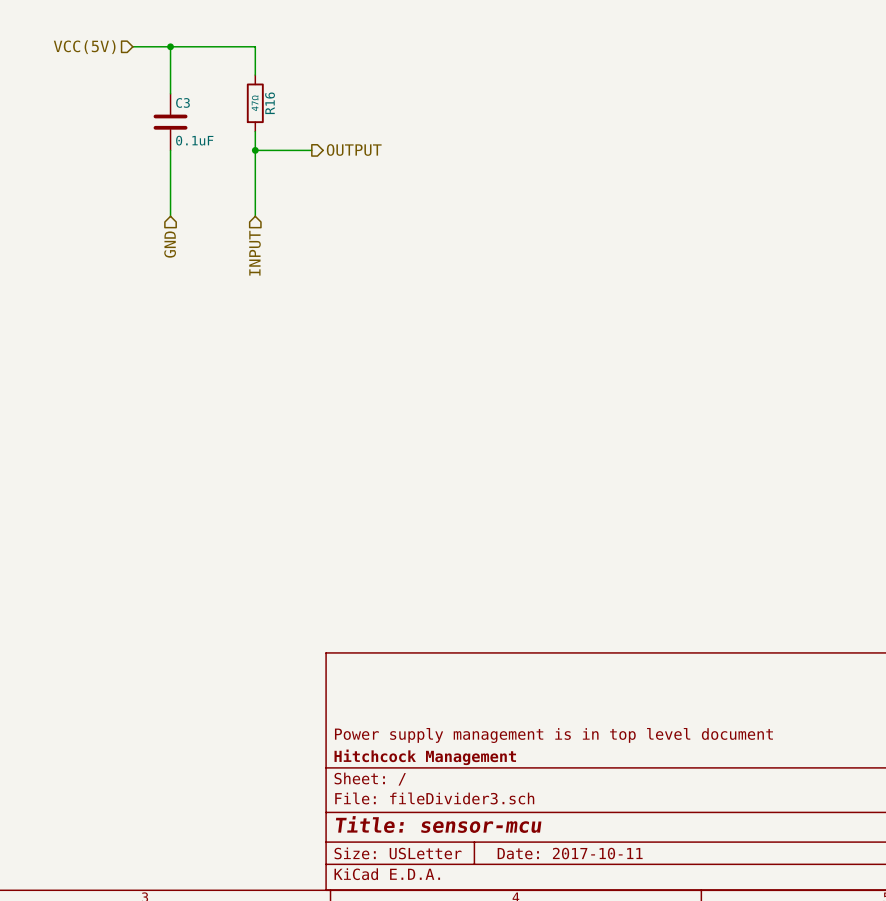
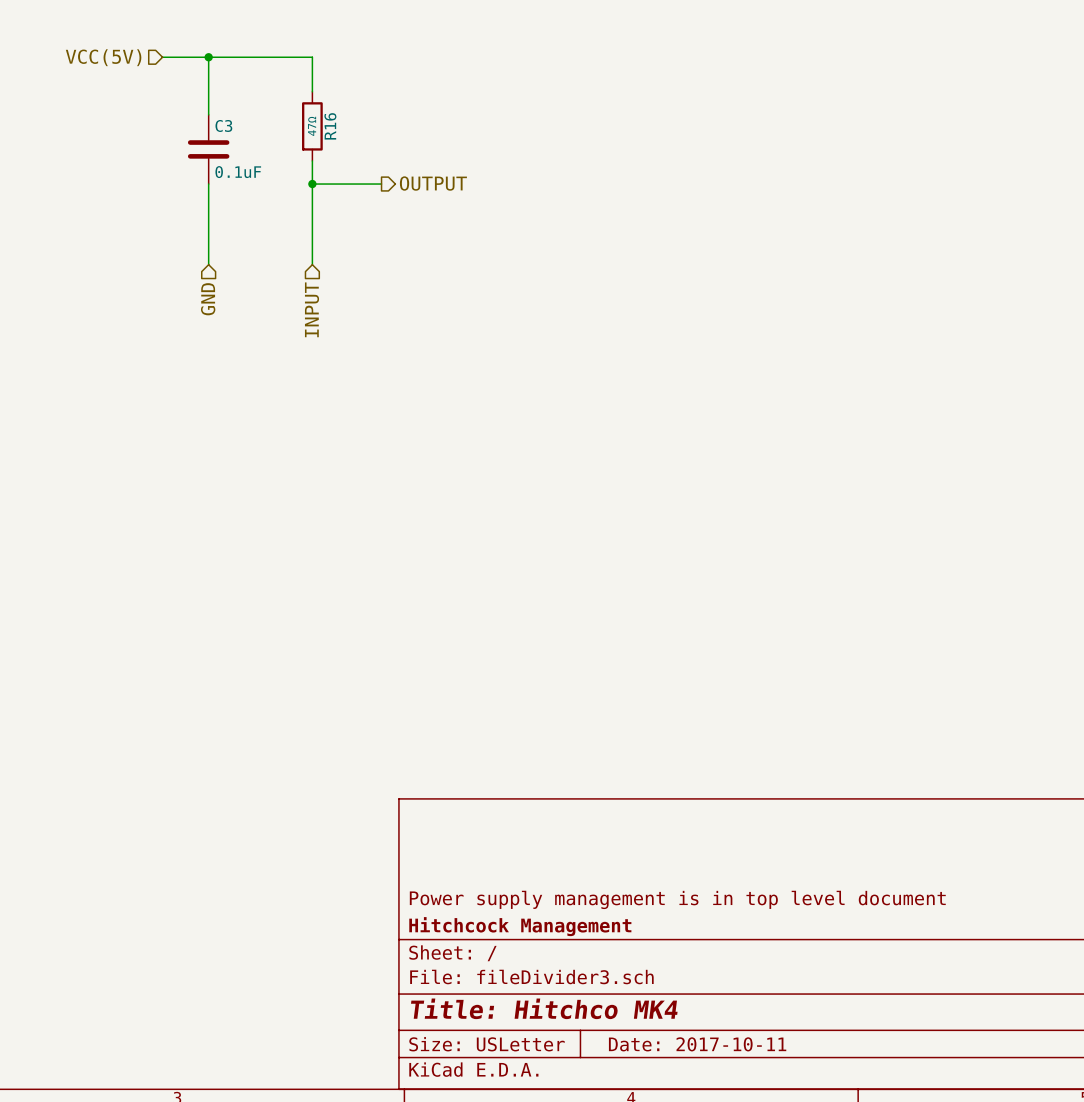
title block: Title: sensor-mcu (438, 824) -> Title: Hitchco MK4 (544, 1008)

